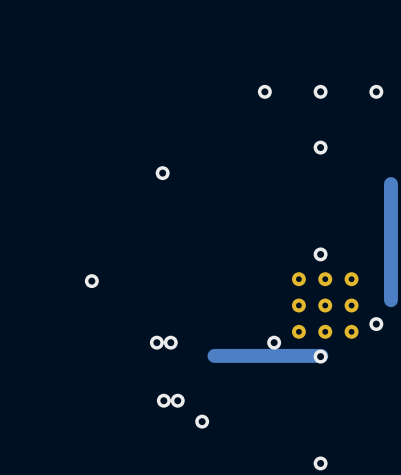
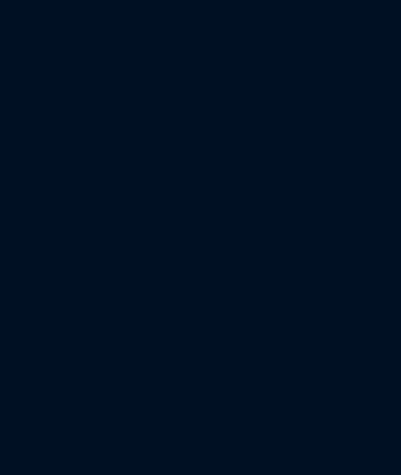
via: (264, 91) -> none
via: (320, 91) -> none
via: (376, 91) -> none
via: (320, 147) -> none
via: (162, 173) -> none
track: (390, 184) (390, 300) -> none
via: (320, 254) -> none
via: (91, 281) -> none
part: (325, 305) -> none
via: (376, 324) -> none
via: (156, 342) -> none
via: (170, 342) -> none
via: (274, 342) -> none
track: (321, 355) (214, 355) -> none
via: (320, 356) -> none
via: (163, 400) -> none
via: (177, 400) -> none
via: (202, 421) -> none
via: (320, 463) -> none

